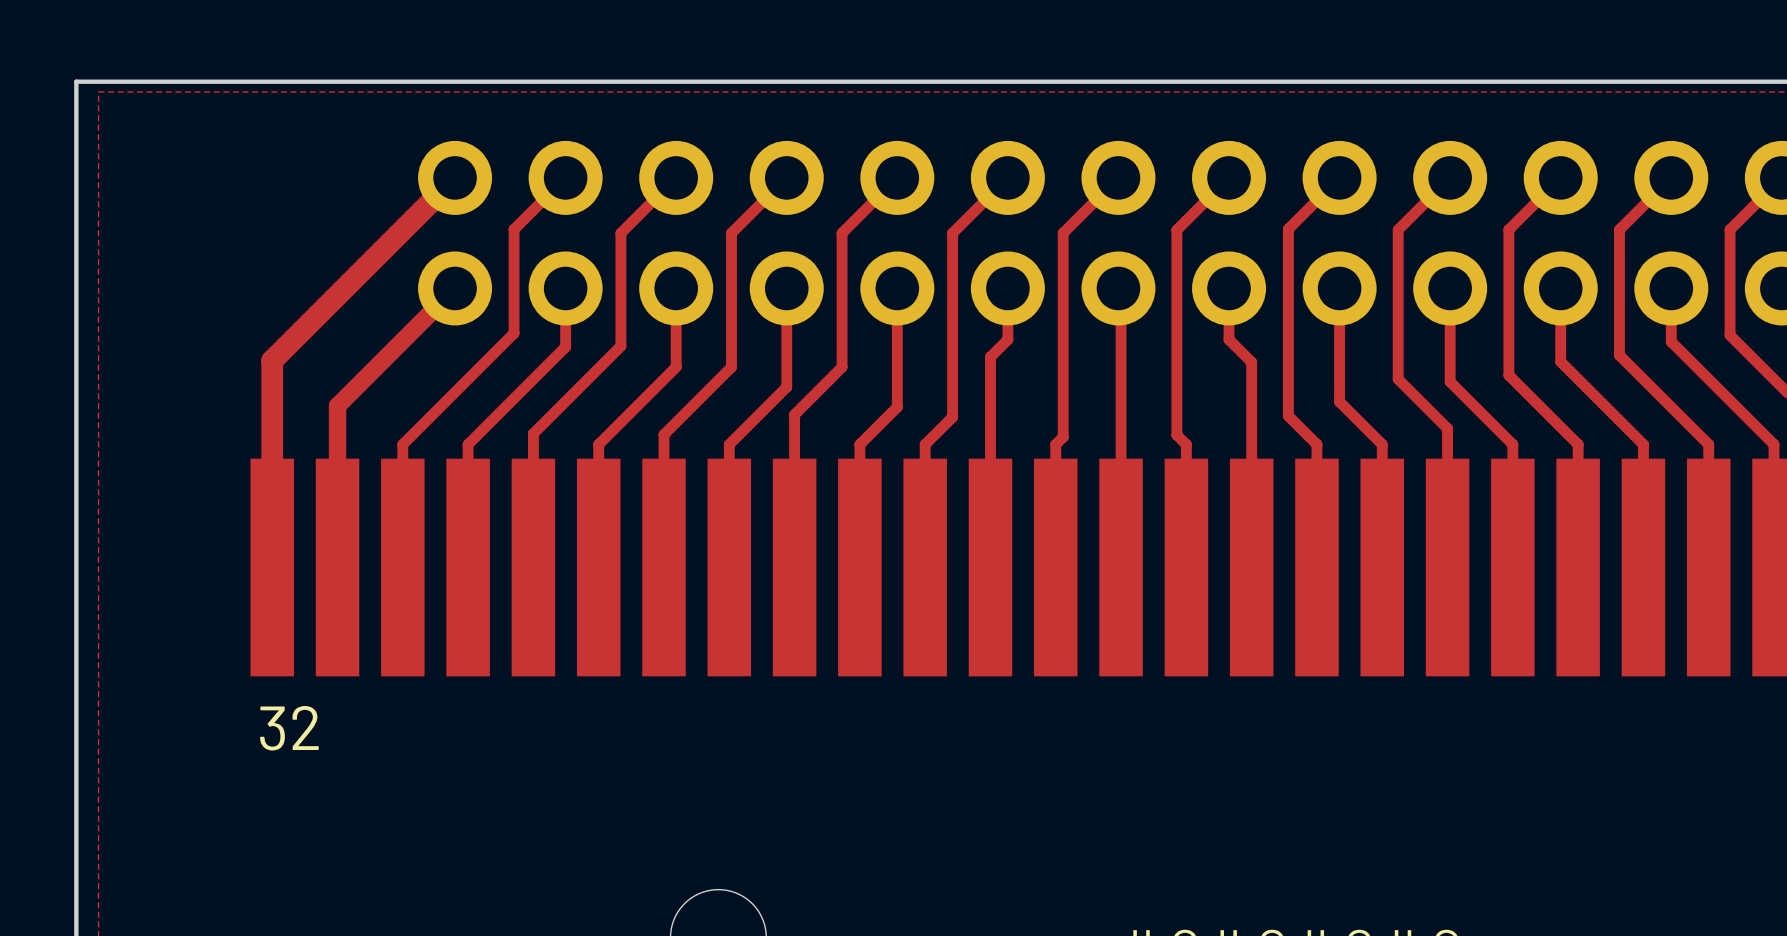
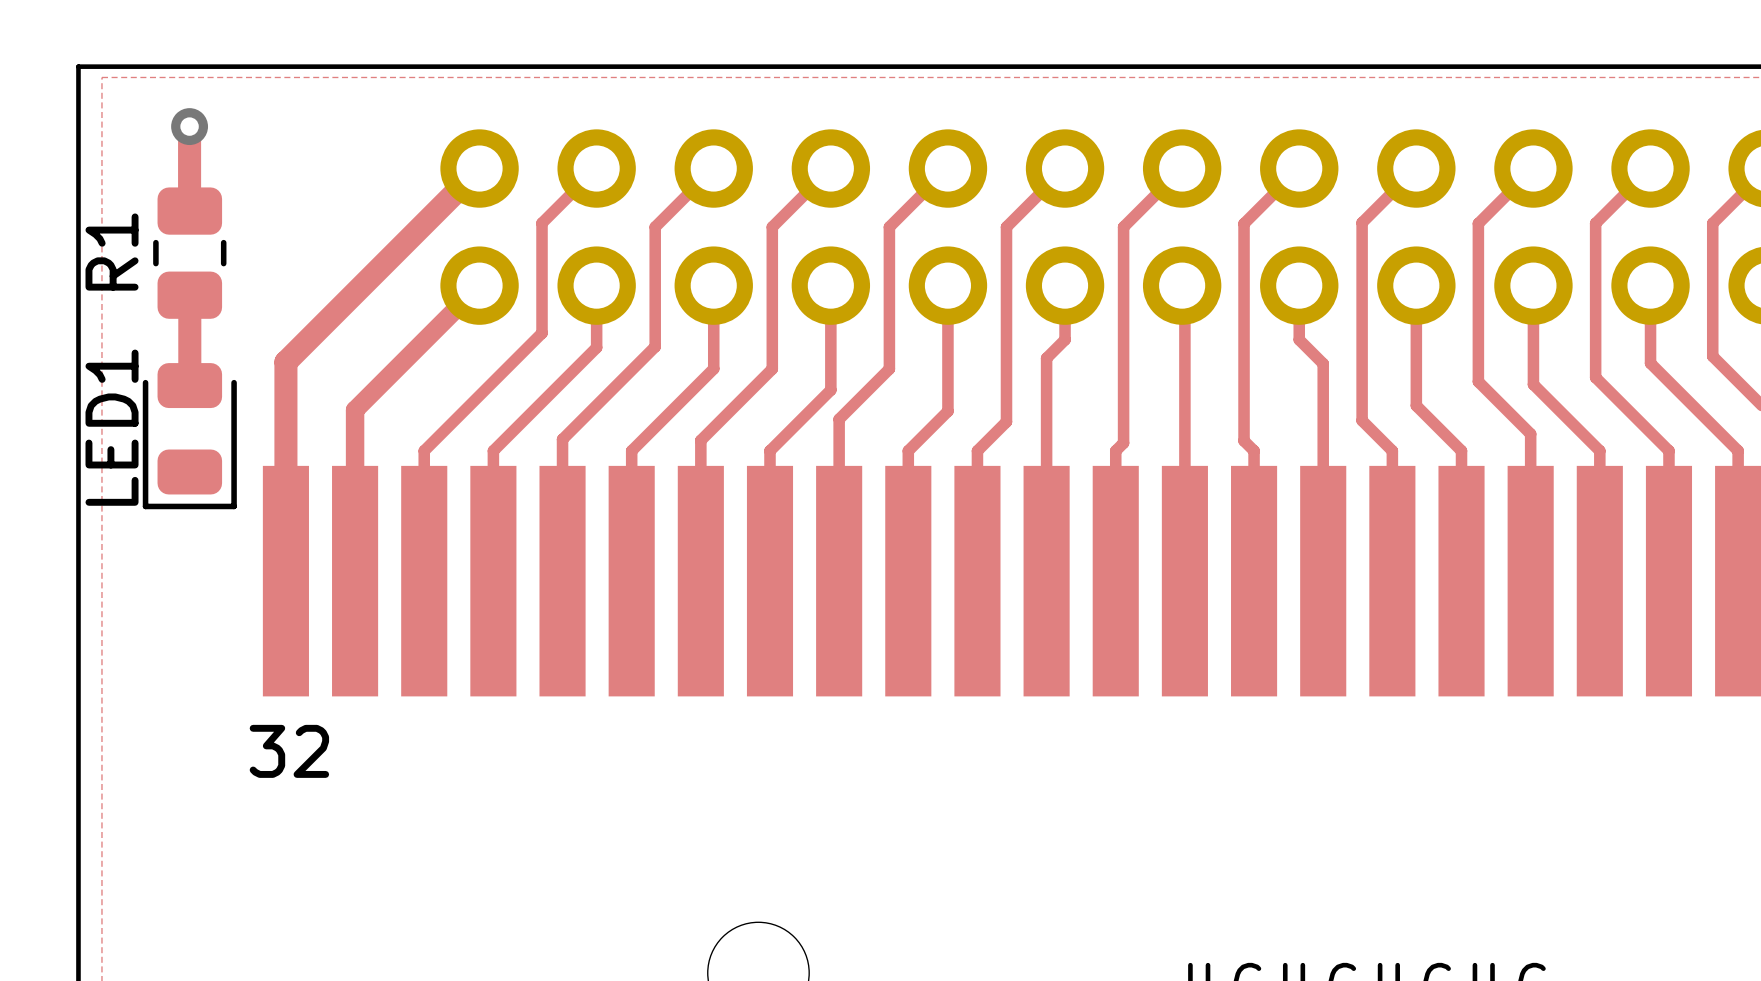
track: none -> (189, 126) (189, 210)
via: none -> (189, 126)
R1: none -> (189, 253)
track: none -> (189, 295) (189, 385)
LED1: none -> (189, 436)

